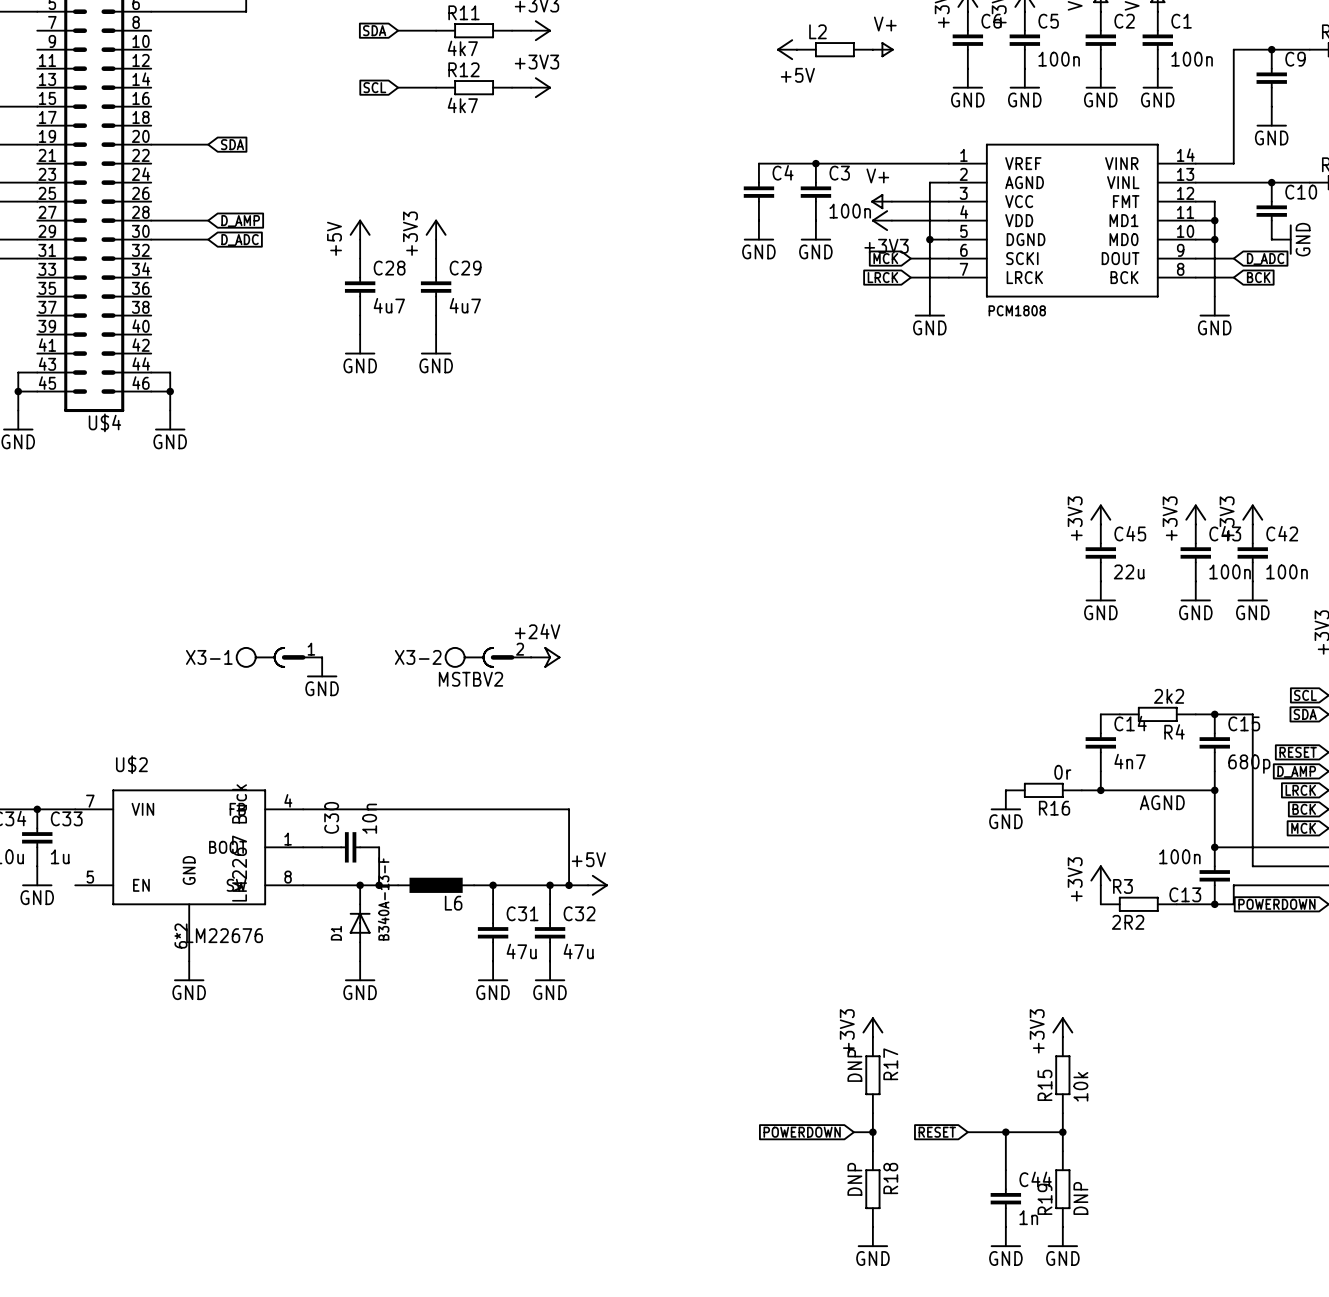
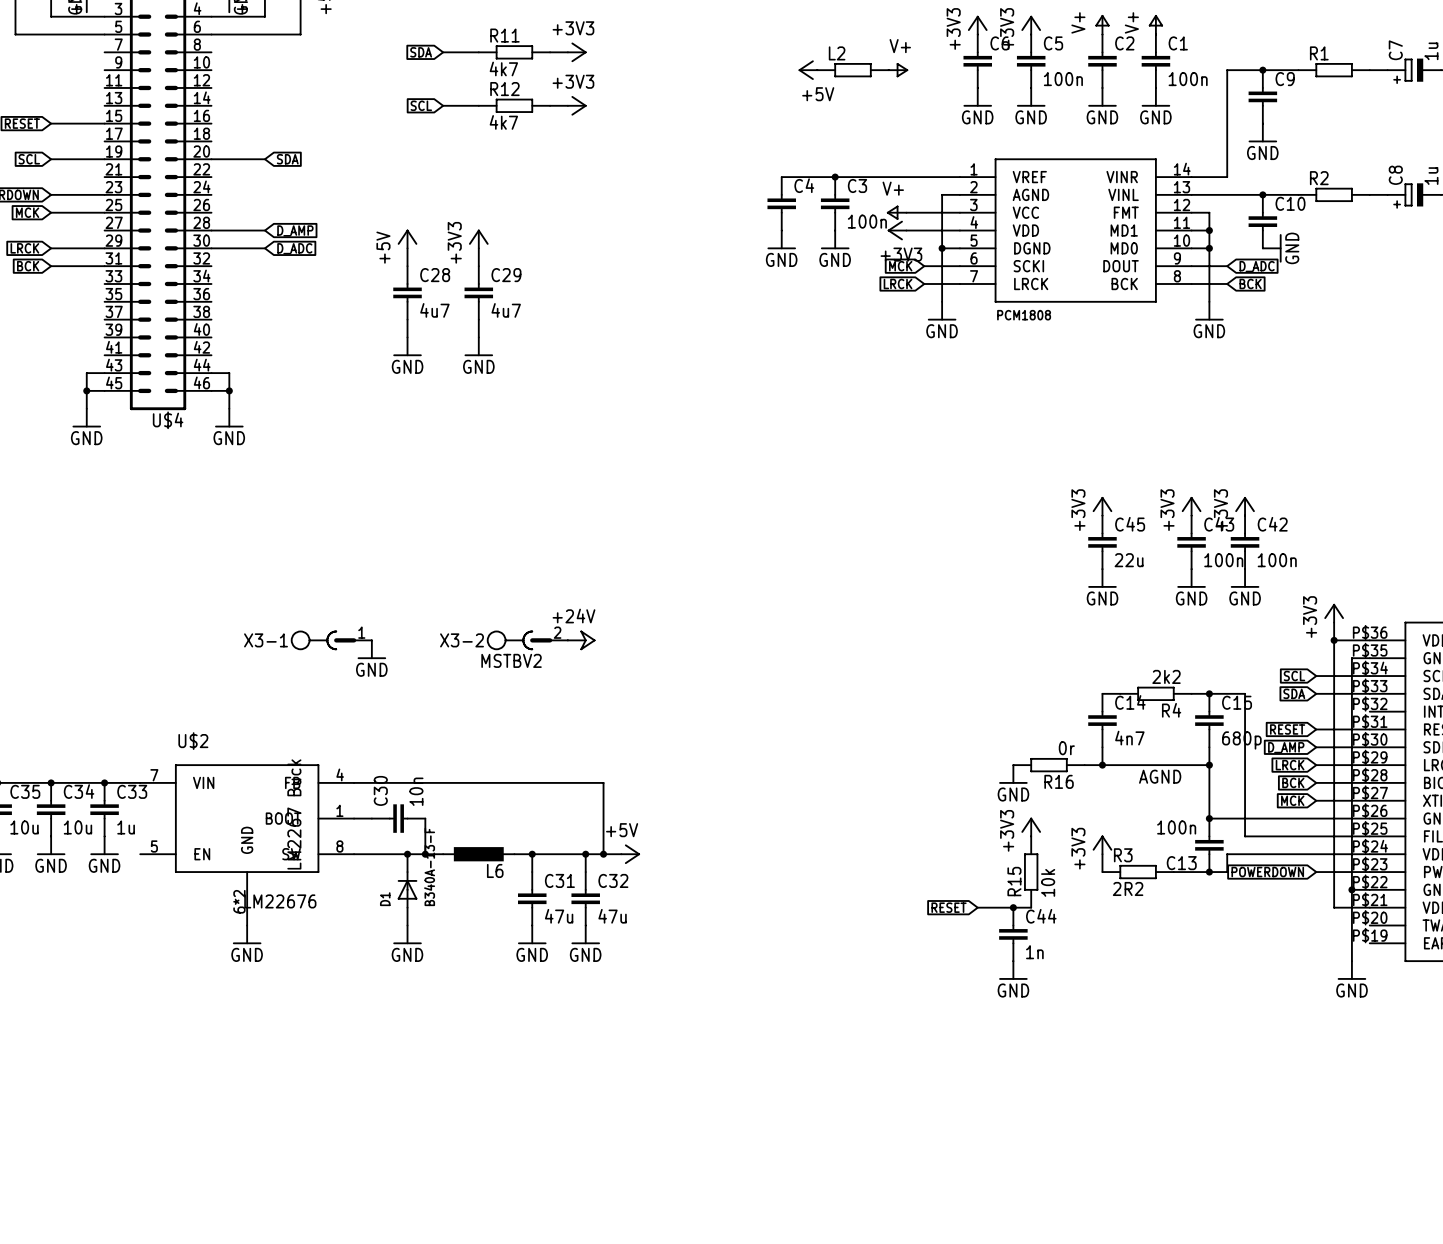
power symbol: none -> +3V3 (1031, 827)
global label: none -> RESET (949, 907)
wire: none -> (977, 907) (1031, 907)
junction: none -> (1013, 907)
power symbol: none -> GND (1013, 970)
power symbol: +3V3 (872, 1027) -> none
power symbol: +3V3 (1062, 1027) -> none
R17: DNP (872, 1075) -> none
R15 position: (1062, 1075) -> (1031, 872)
wire: (872, 1113) (872, 1151) -> none
wire: (1062, 1113) (1062, 1151) -> none
global label: POWERDOWN (802, 1132) -> none
wire: (853, 1132) (872, 1132) -> none
junction: (872, 1132) -> none
global label: RESET (937, 1132) -> none
wire: (967, 1132) (1062, 1132) -> none
wire: (1005, 1132) (1005, 1170) -> none
junction: (1005, 1132) -> none
junction: (1062, 1132) -> none
R18: DNP (872, 1189) -> none
R19: DNP (1062, 1189) -> none
C44 position: (1005, 1198) -> (1013, 934)
power symbol: GND (872, 1237) -> none
power symbol: GND (1005, 1237) -> none
power symbol: GND (1062, 1237) -> none

